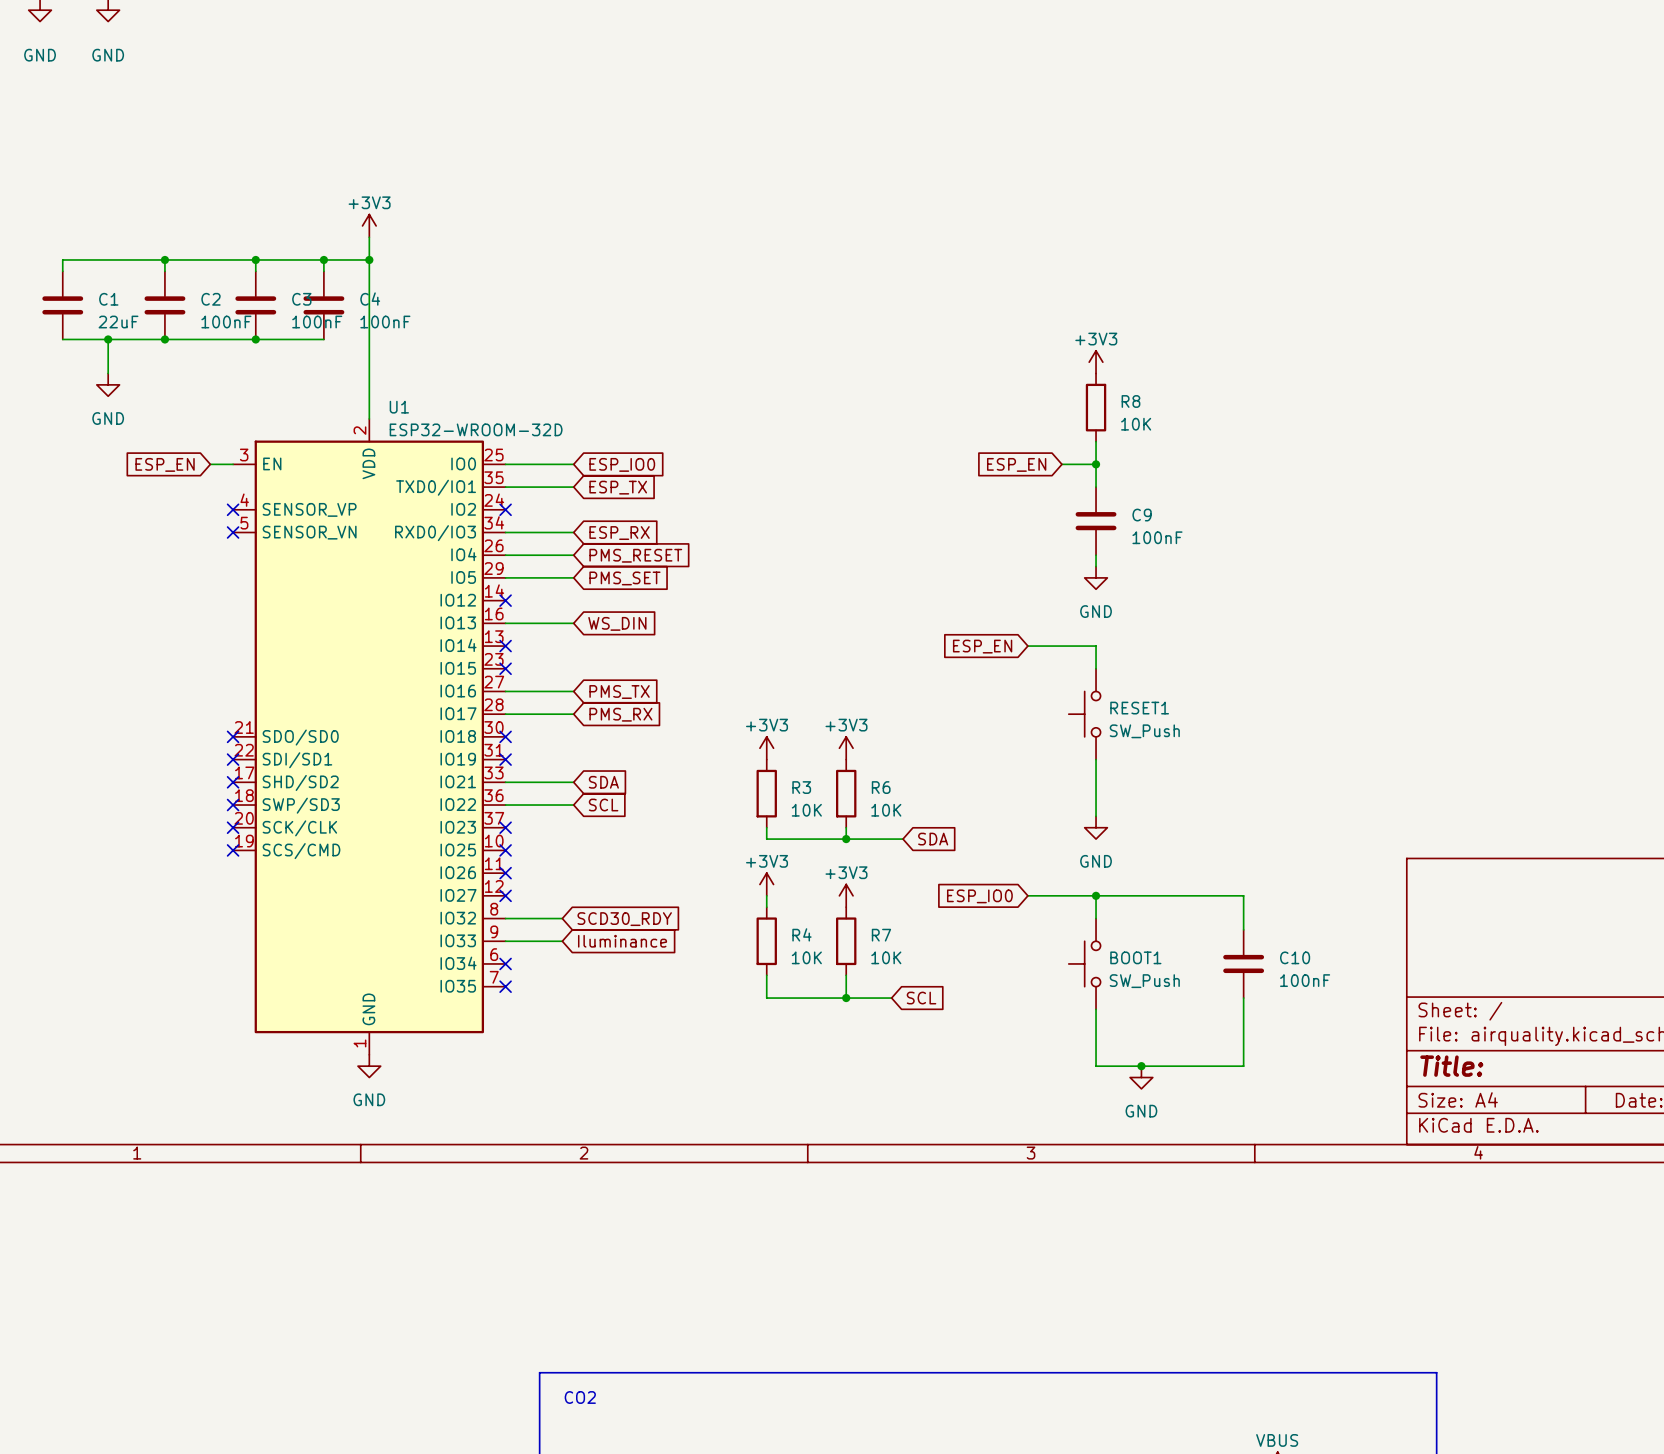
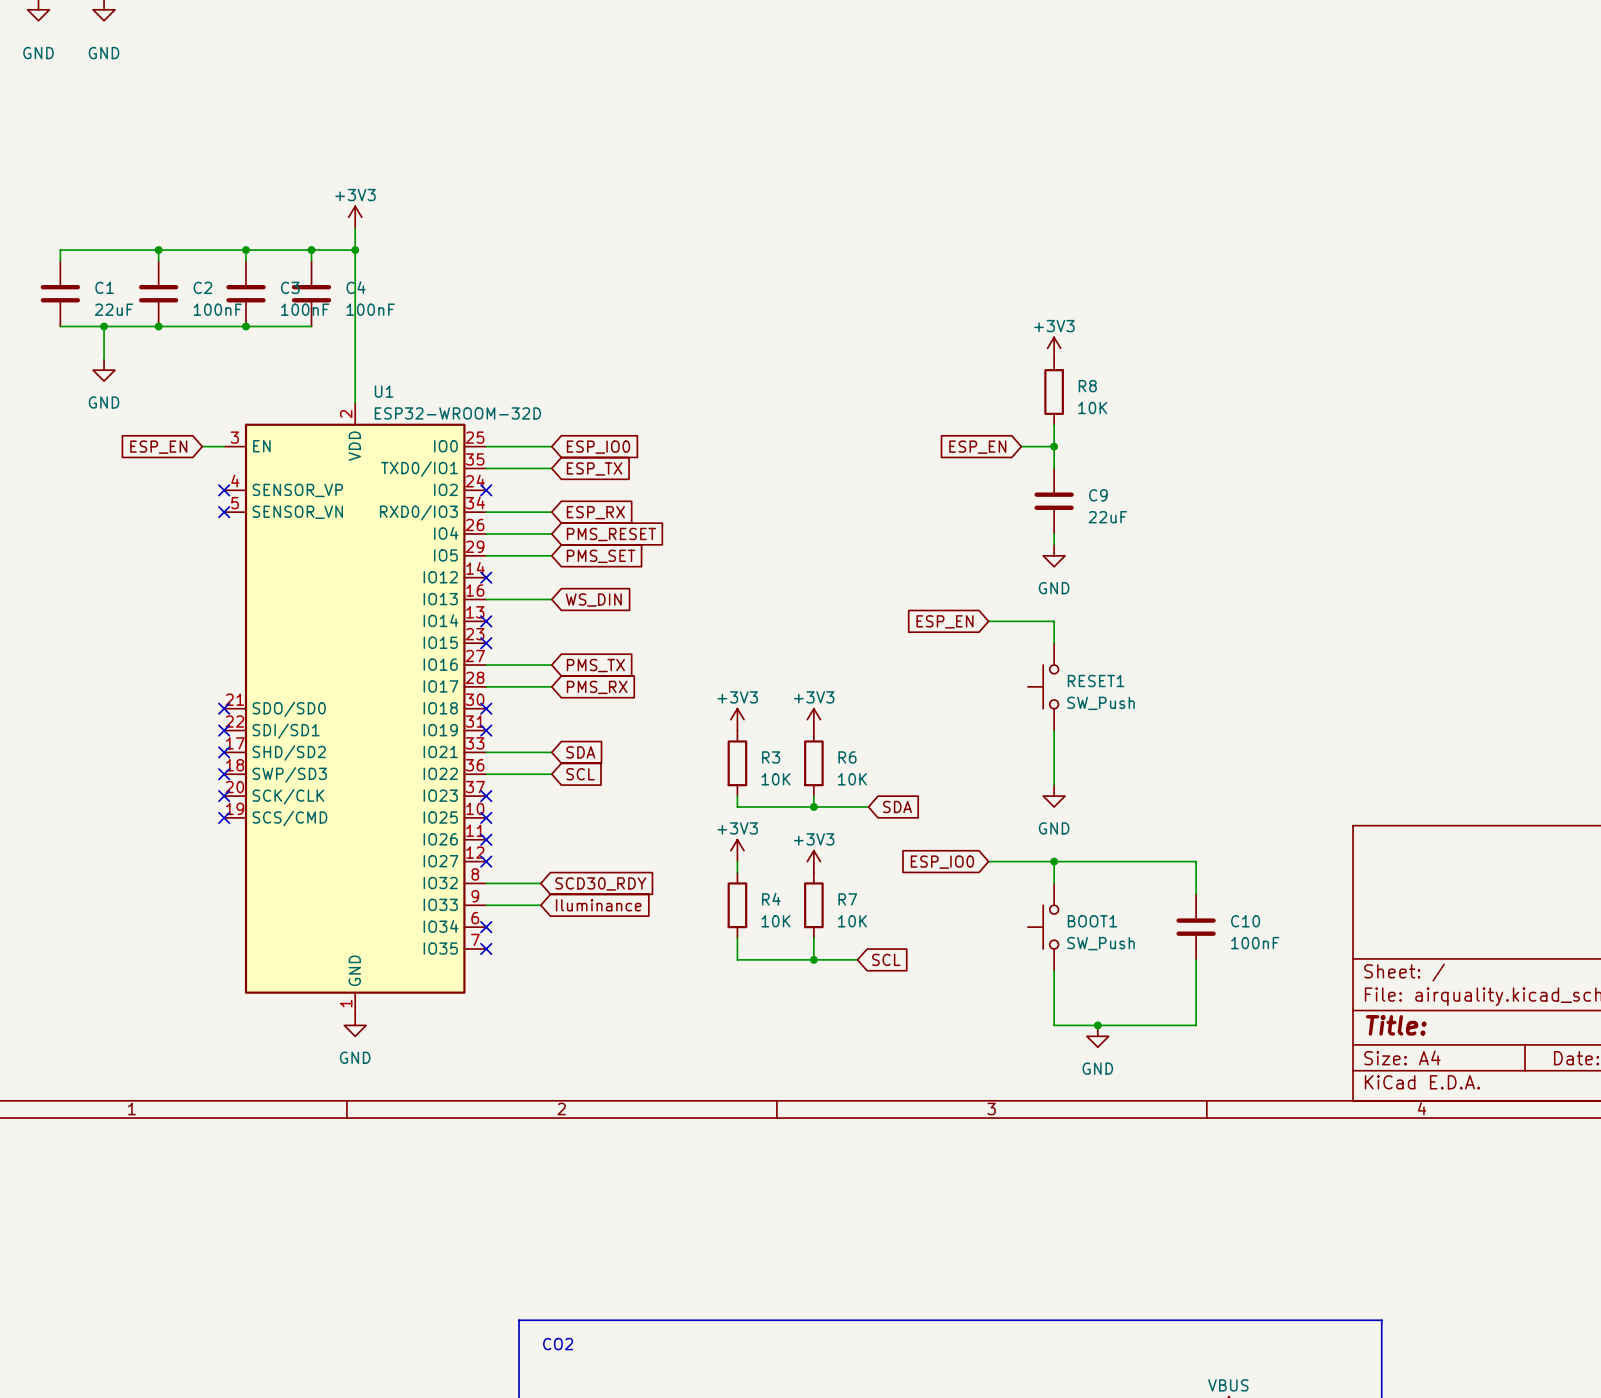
C9 value: 100nF (1157, 537) -> 22uF (1107, 517)

